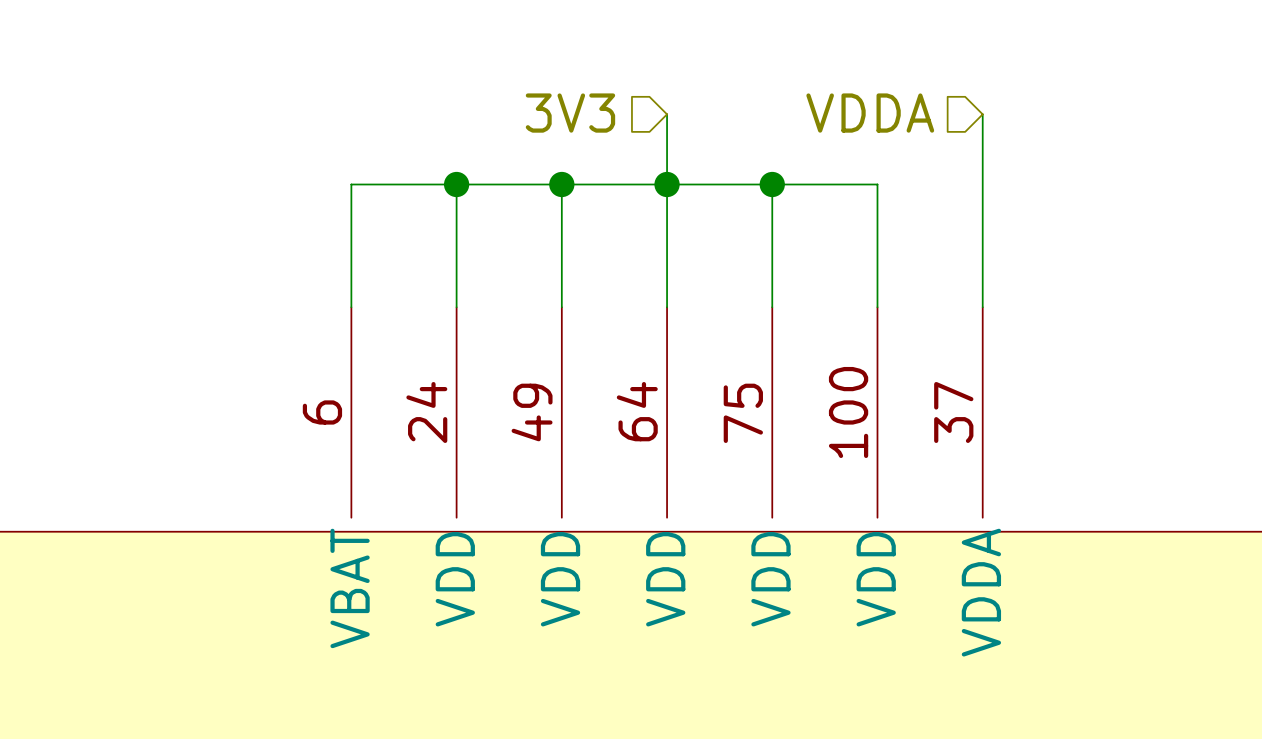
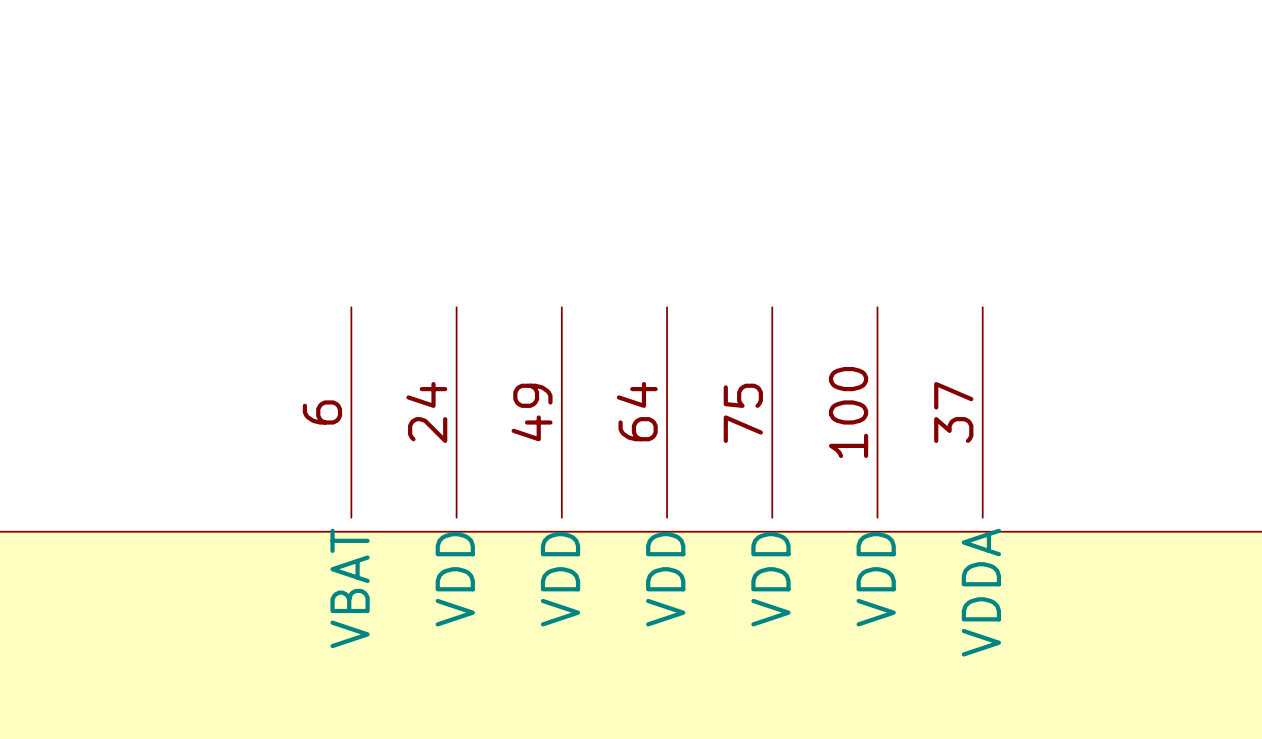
hierarchical label: 3V3 (570, 113) -> none
hierarchical label: VDDA (870, 113) -> none
wire: (667, 114) (667, 307) -> none
wire: (982, 114) (982, 307) -> none
wire: (456, 184) (456, 307) -> none
junction: (456, 184) -> none
wire: (561, 184) (561, 307) -> none
junction: (561, 184) -> none
junction: (667, 184) -> none
wire: (772, 184) (772, 307) -> none
junction: (772, 184) -> none
wire: (351, 307) (351, 184) (877, 184) (877, 307) -> none

